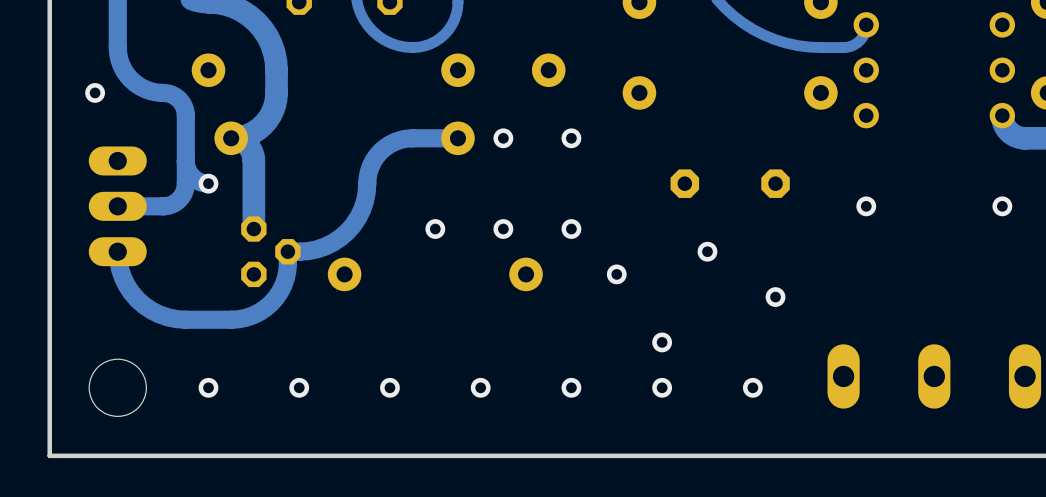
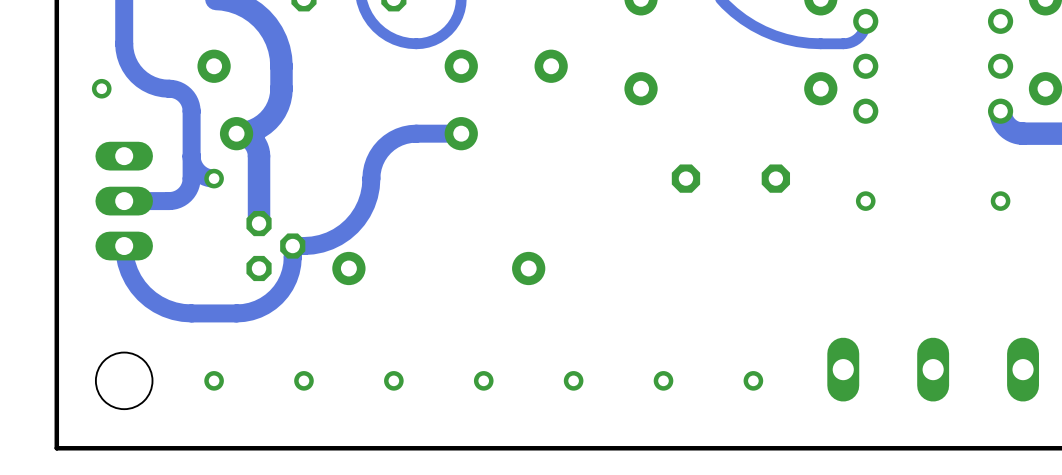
via: (503, 138) -> none
via: (571, 138) -> none
via: (435, 229) -> none
via: (503, 229) -> none
via: (571, 229) -> none
via: (707, 251) -> none
via: (616, 274) -> none
via: (775, 297) -> none
via: (662, 342) -> none

